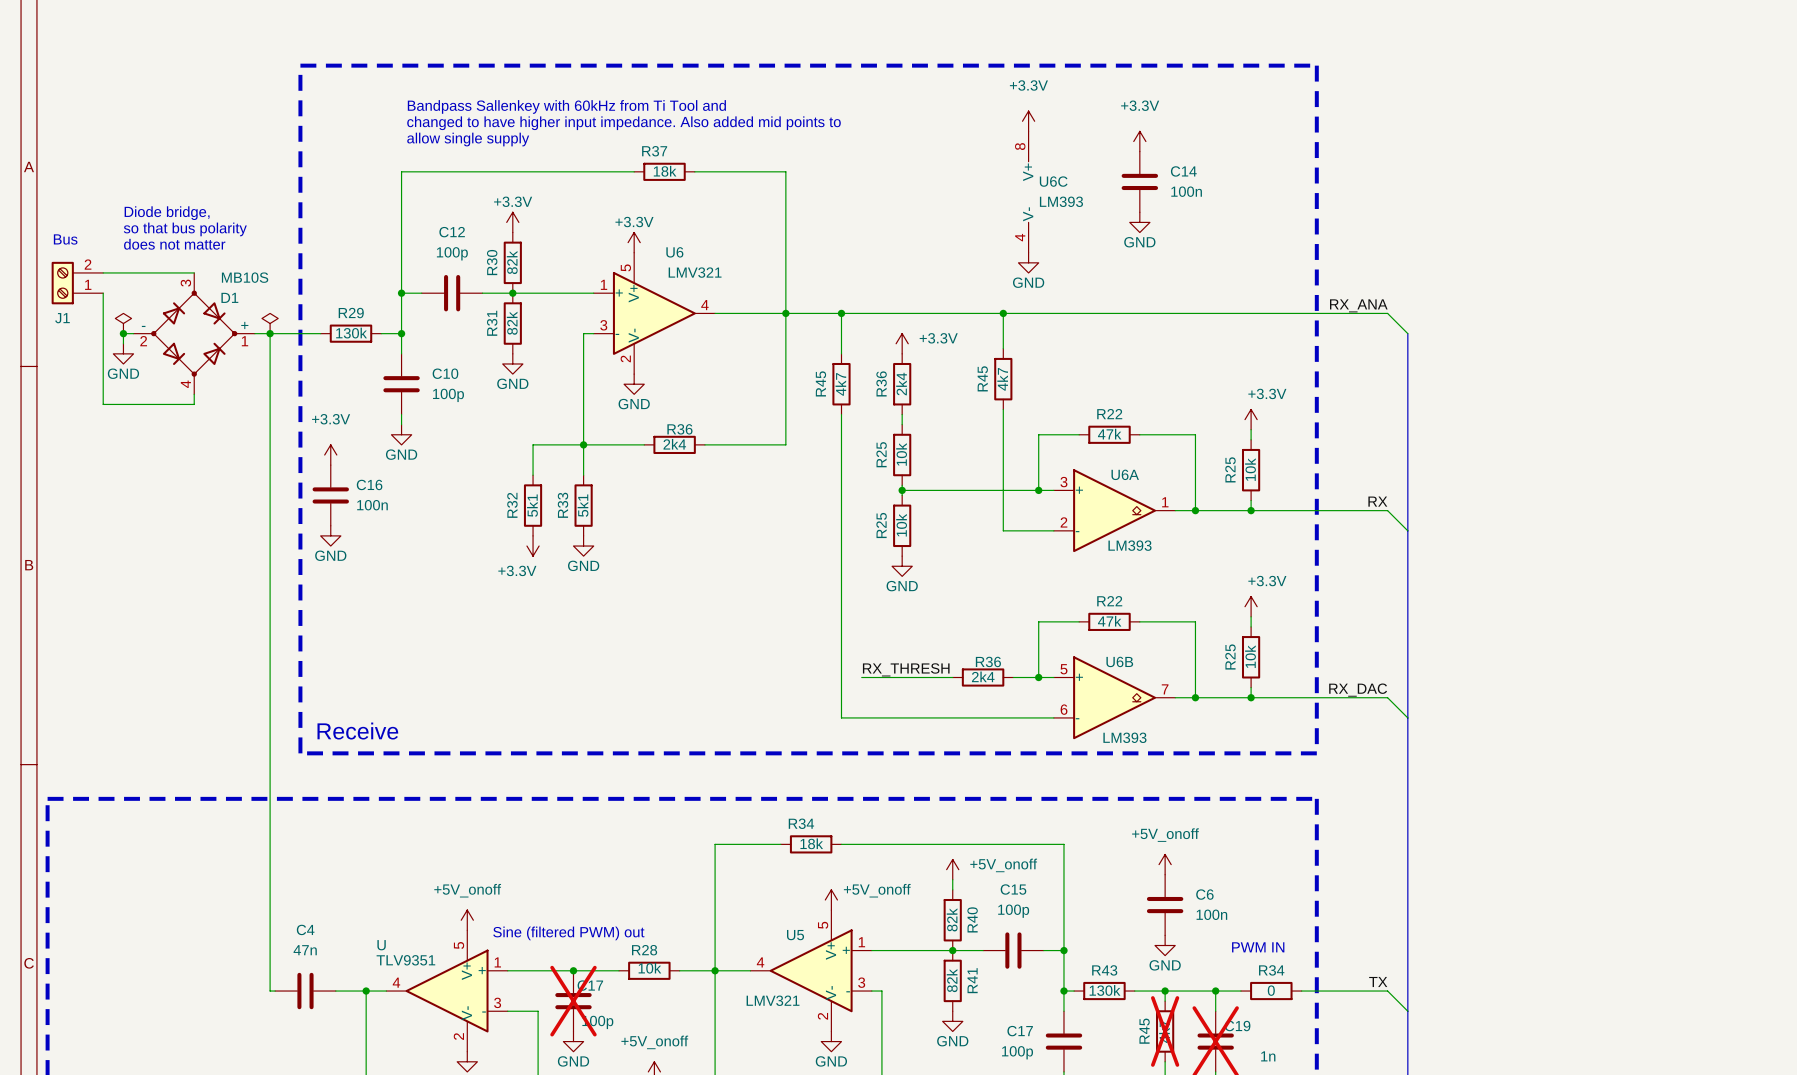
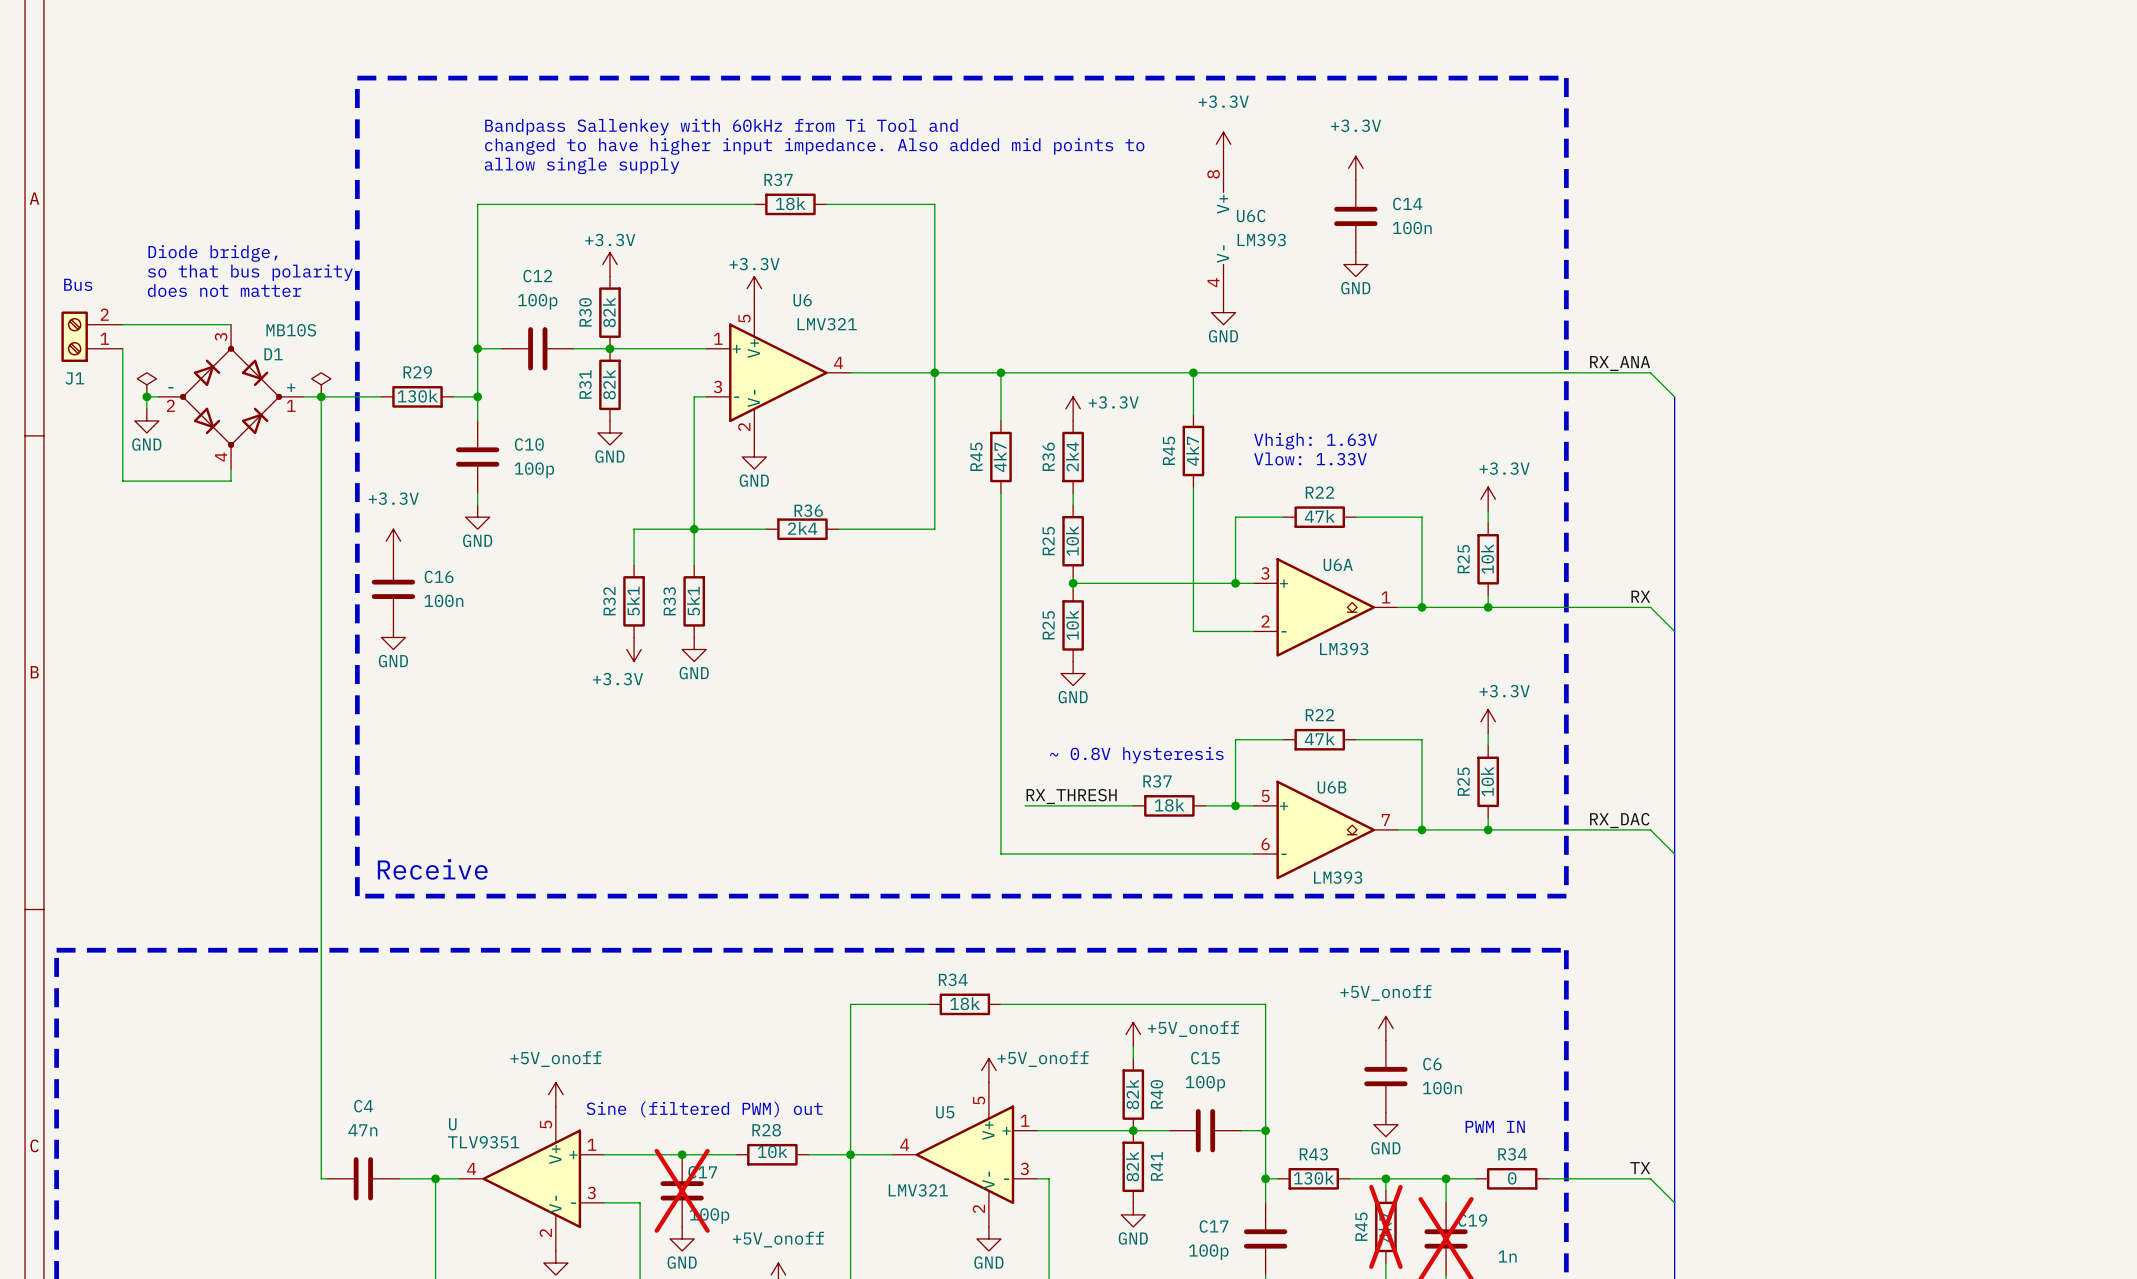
text: none -> Vhigh: 1.63V (1315, 441)
text: none -> Vlow: 1.33V (1310, 458)
text: none -> ~ 0.8V hysteresis (1136, 755)
R36 name: R36 (988, 661) -> R37 (1157, 781)
R36 value: 2k4 (983, 676) -> 18k (1169, 805)

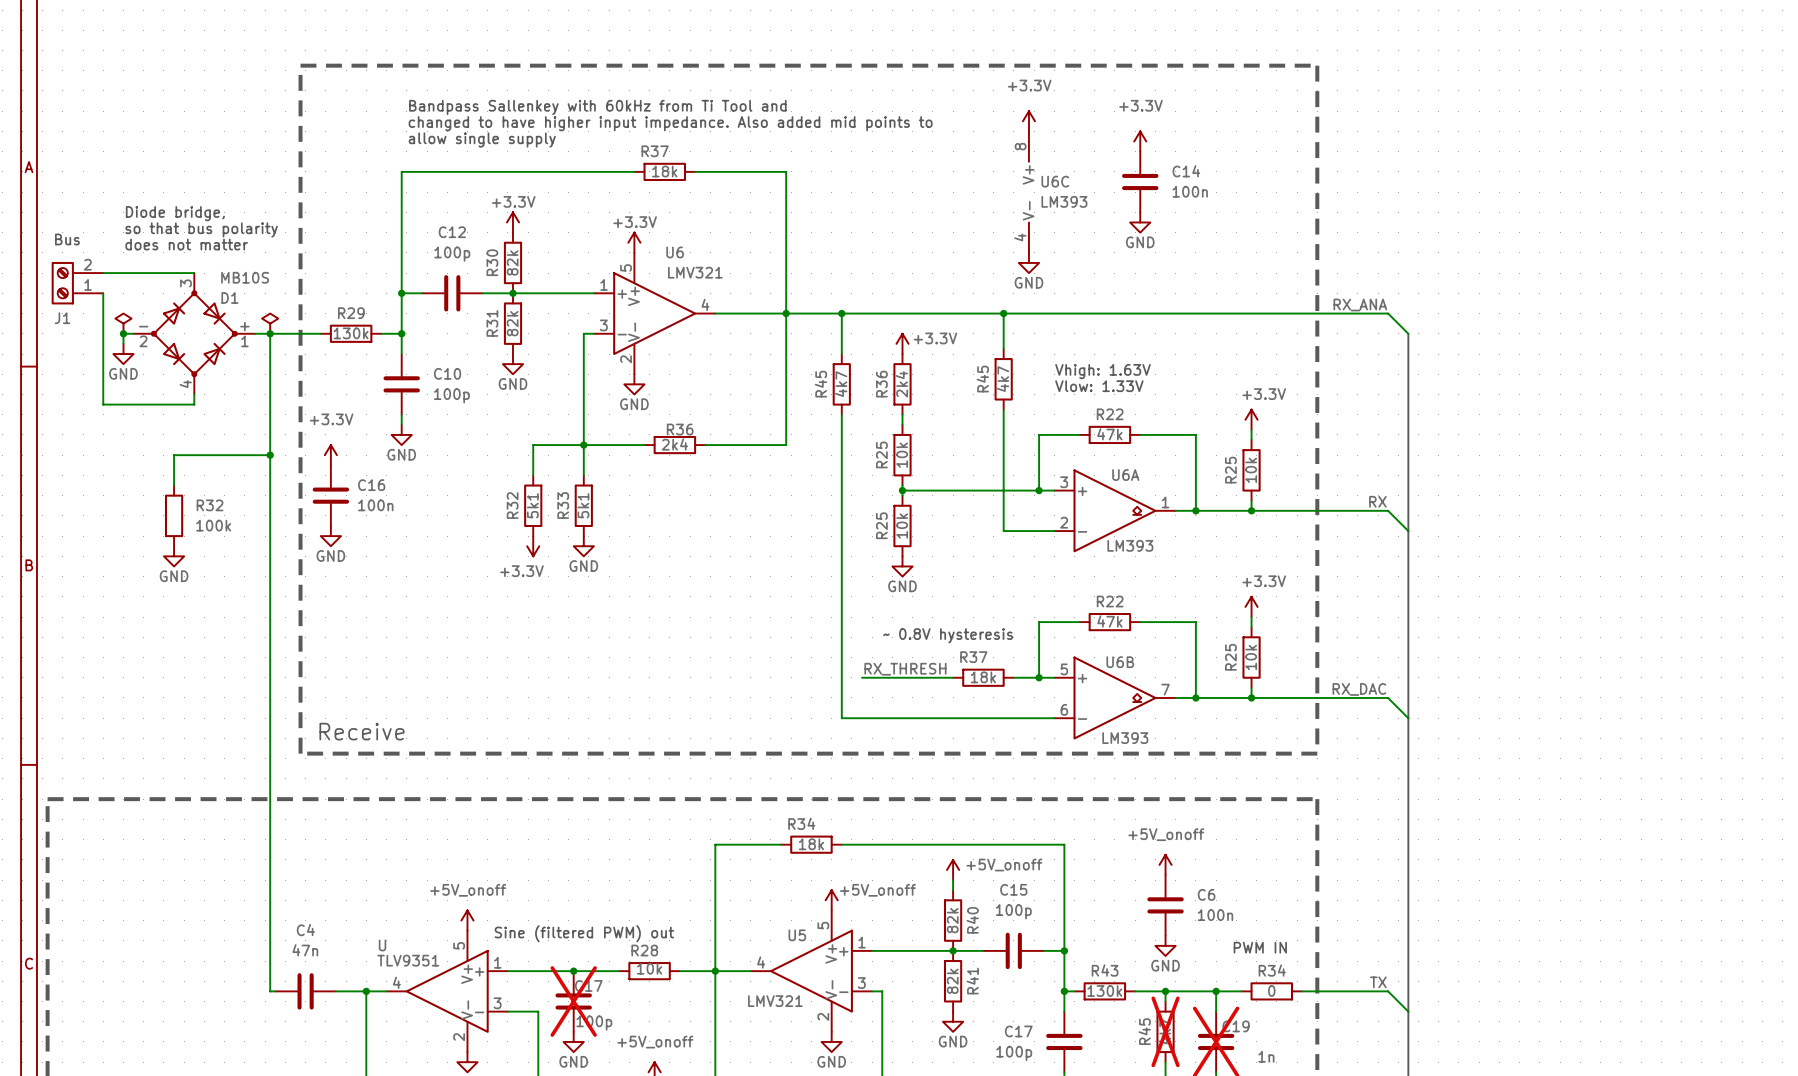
wire: none -> (270, 455) (174, 455) (174, 485)
junction: none -> (270, 455)
R32: none -> 100k (174, 515)
power symbol: none -> GND (174, 556)

